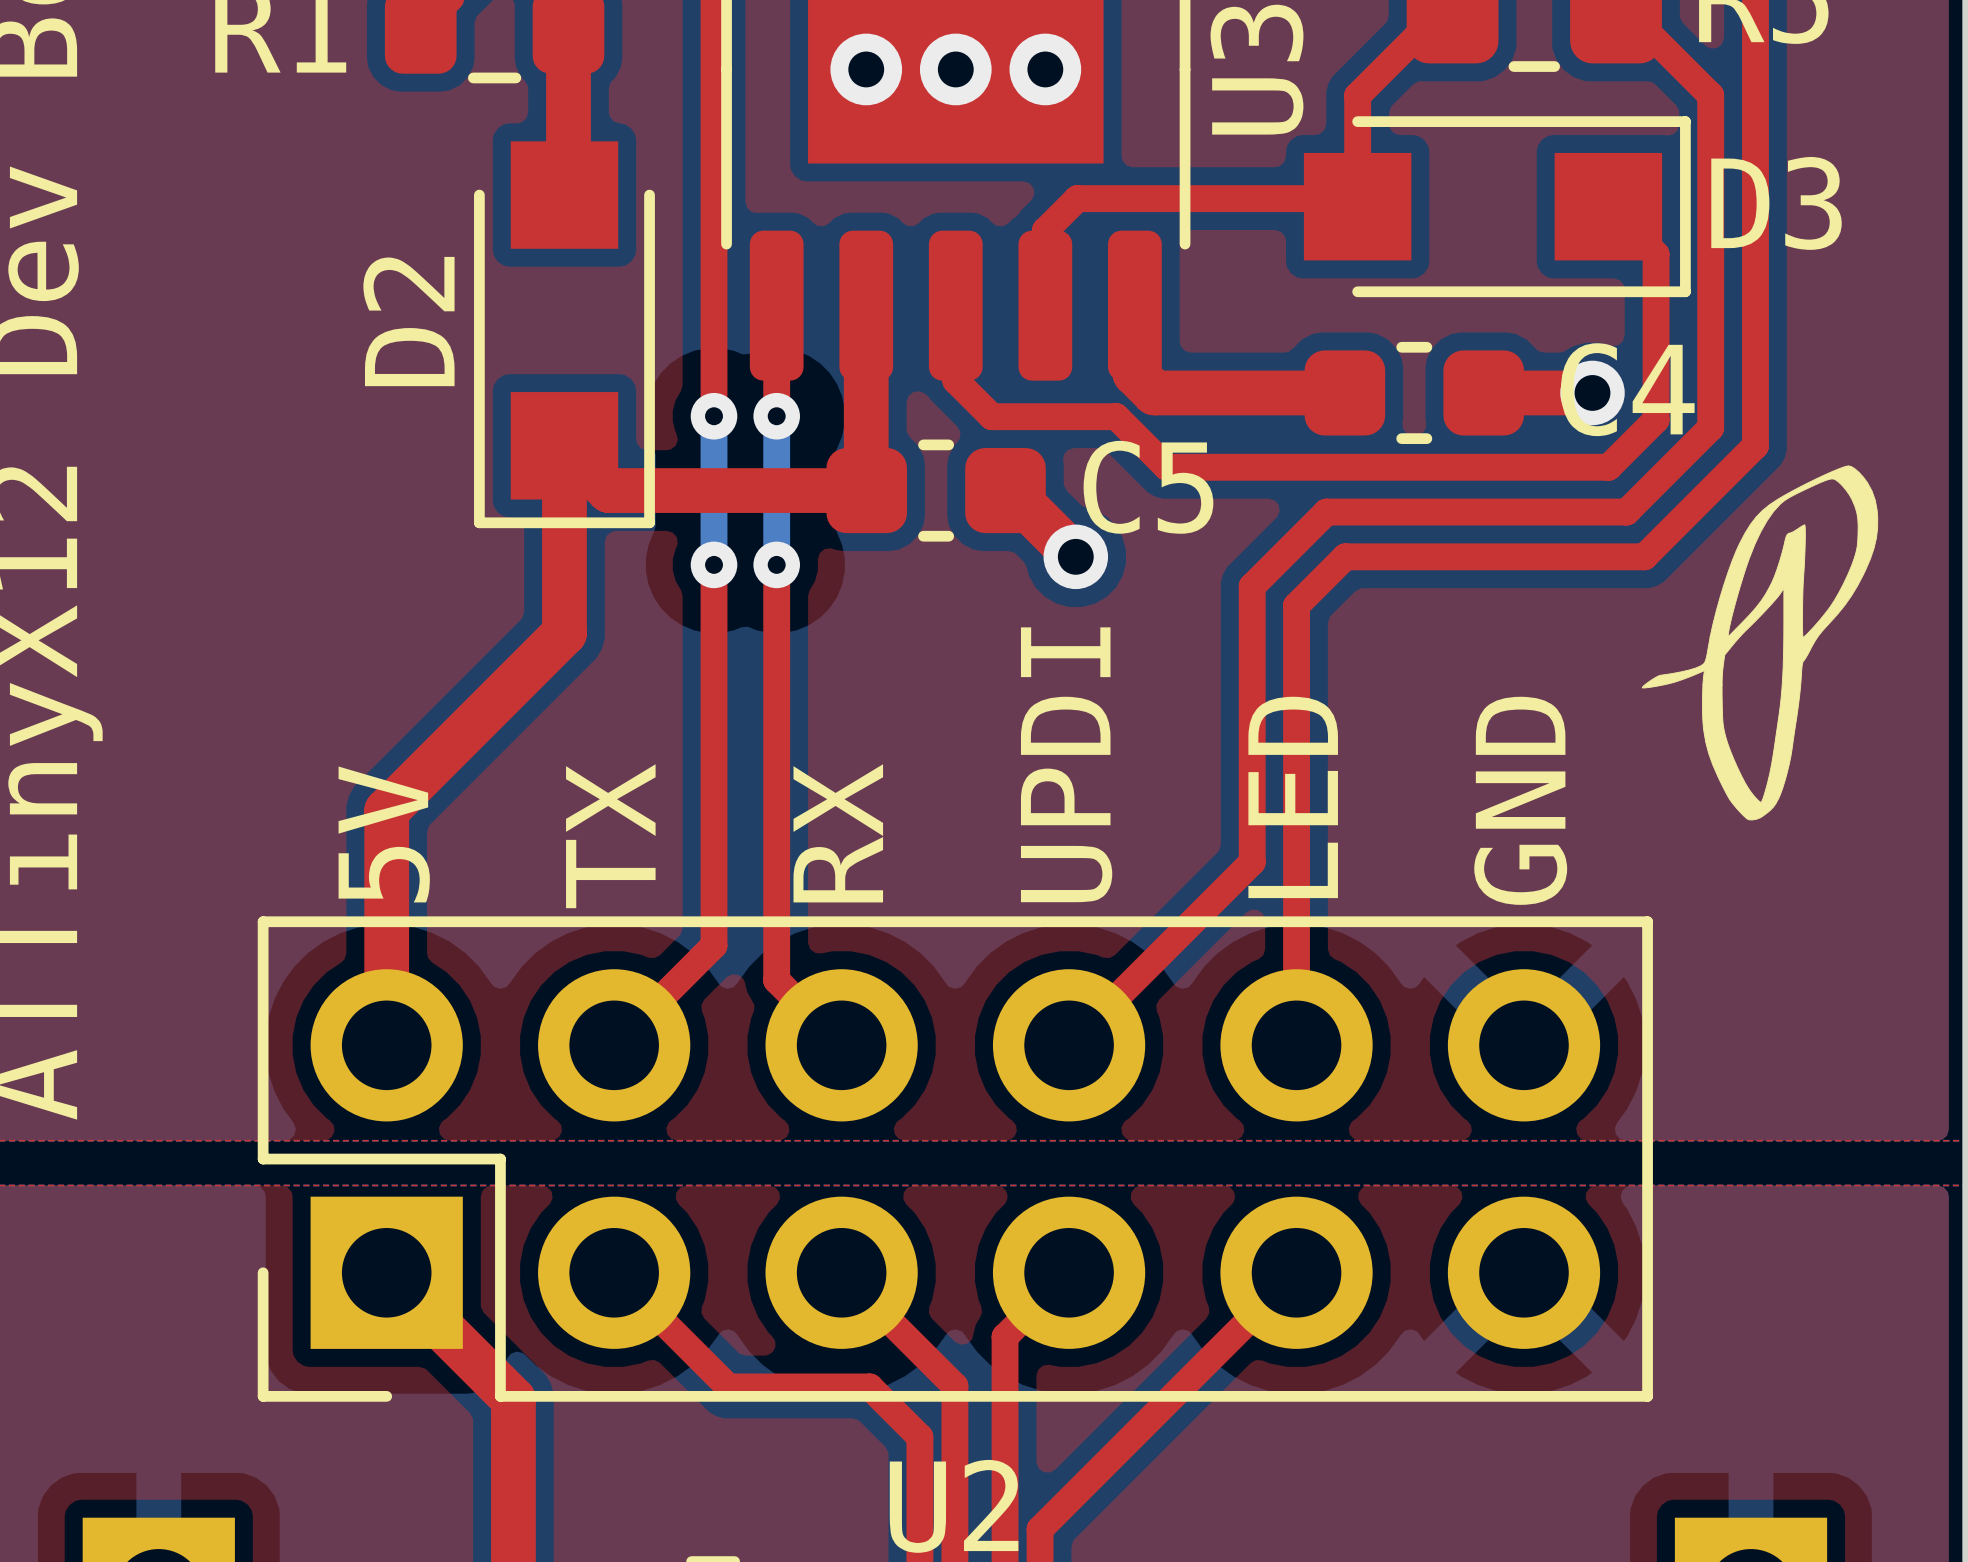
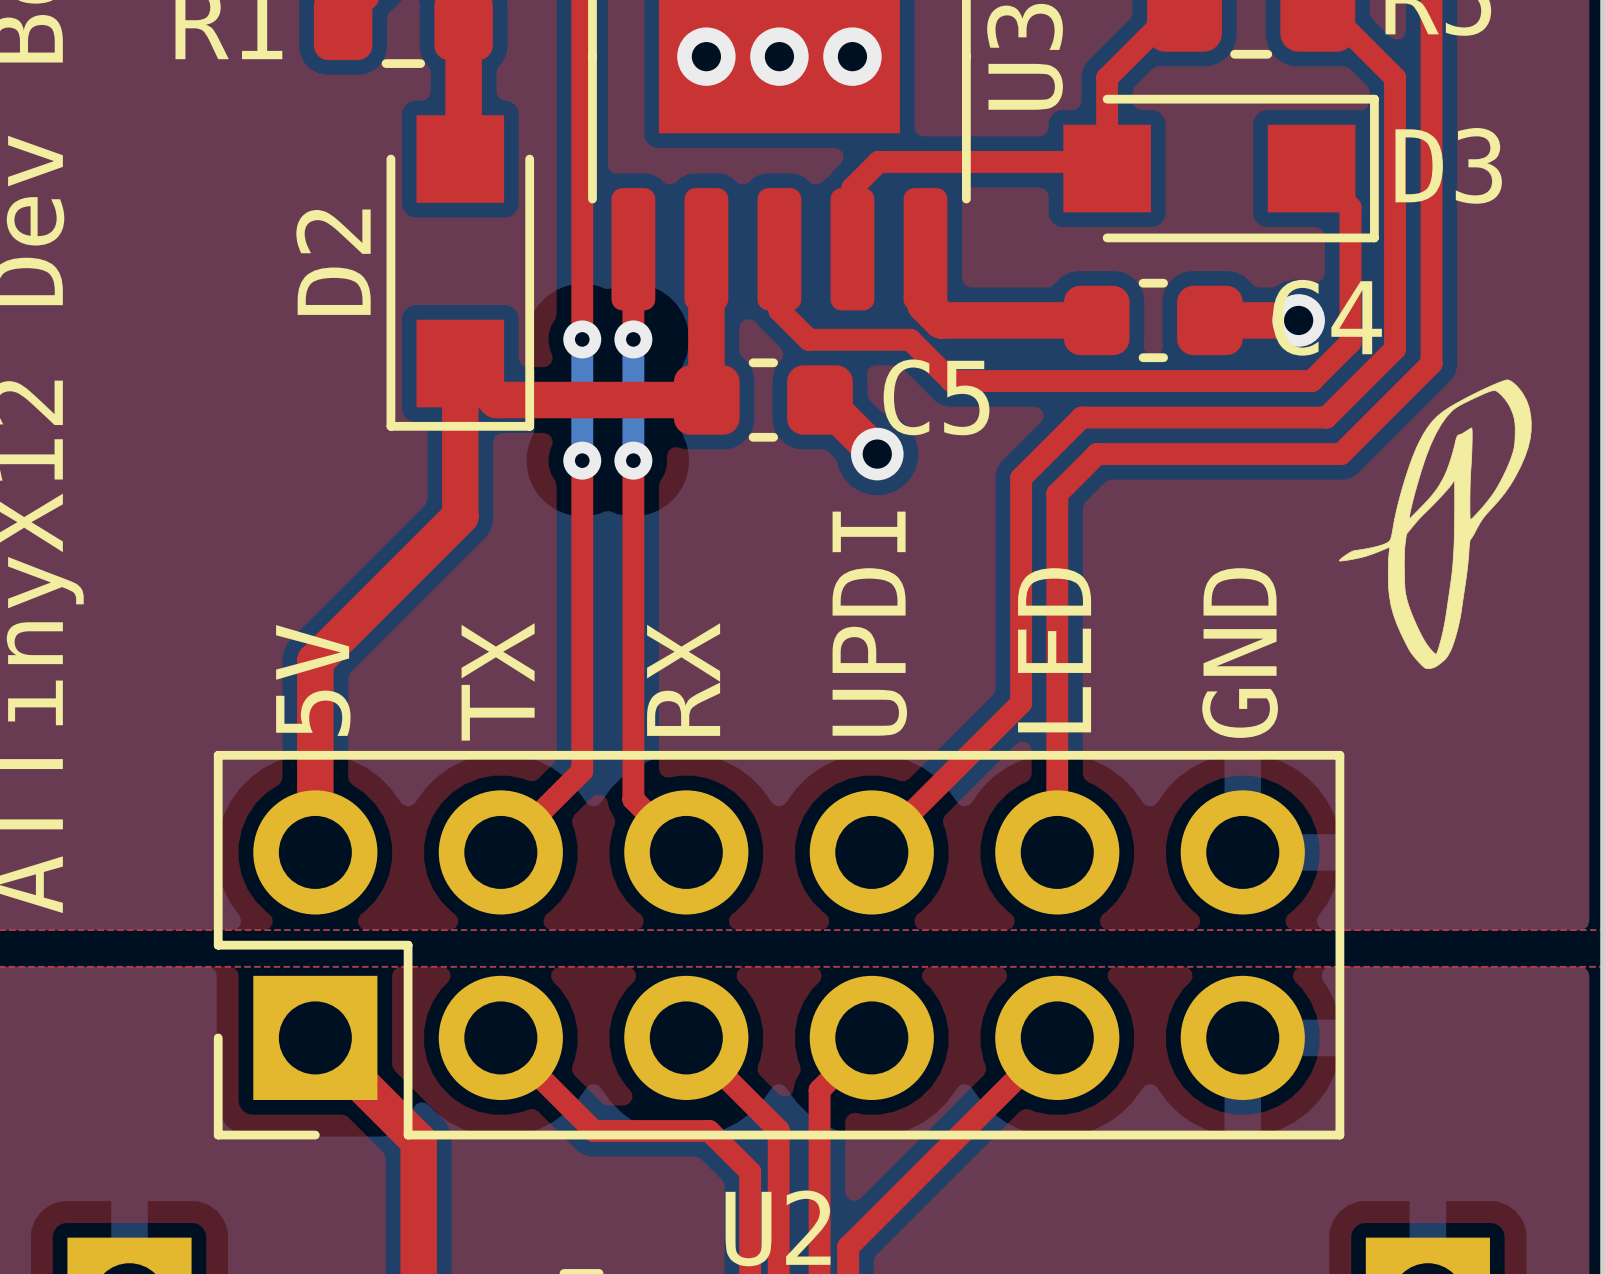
part footprint: [257, 916, 1653, 1402] -> [213, 750, 1345, 1140]

